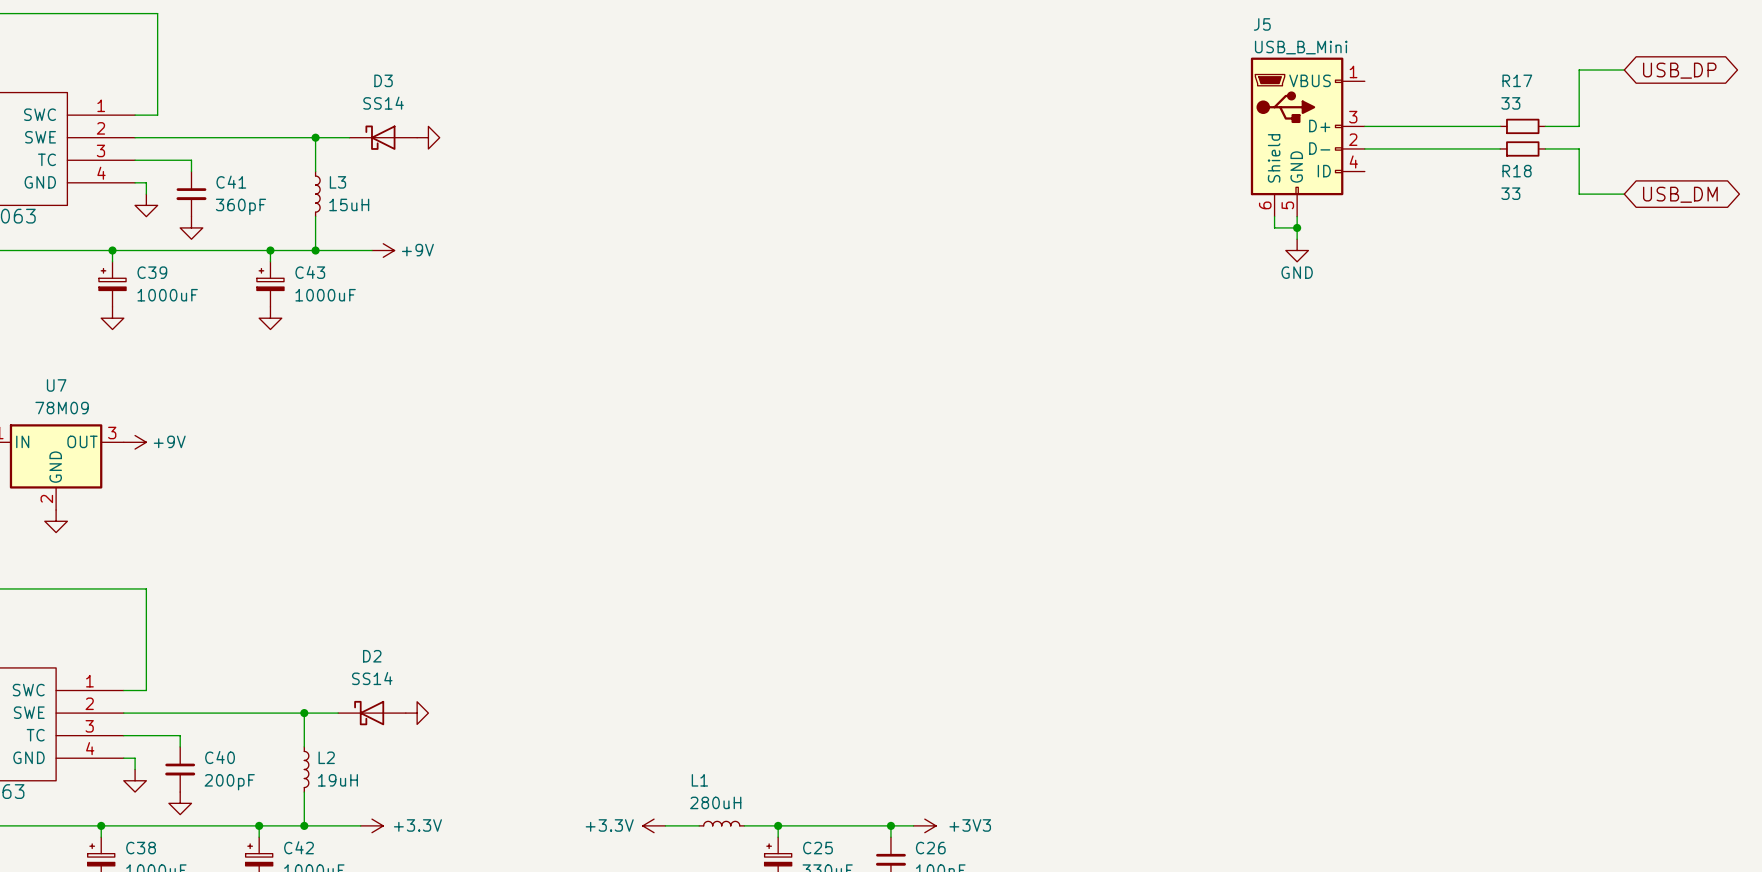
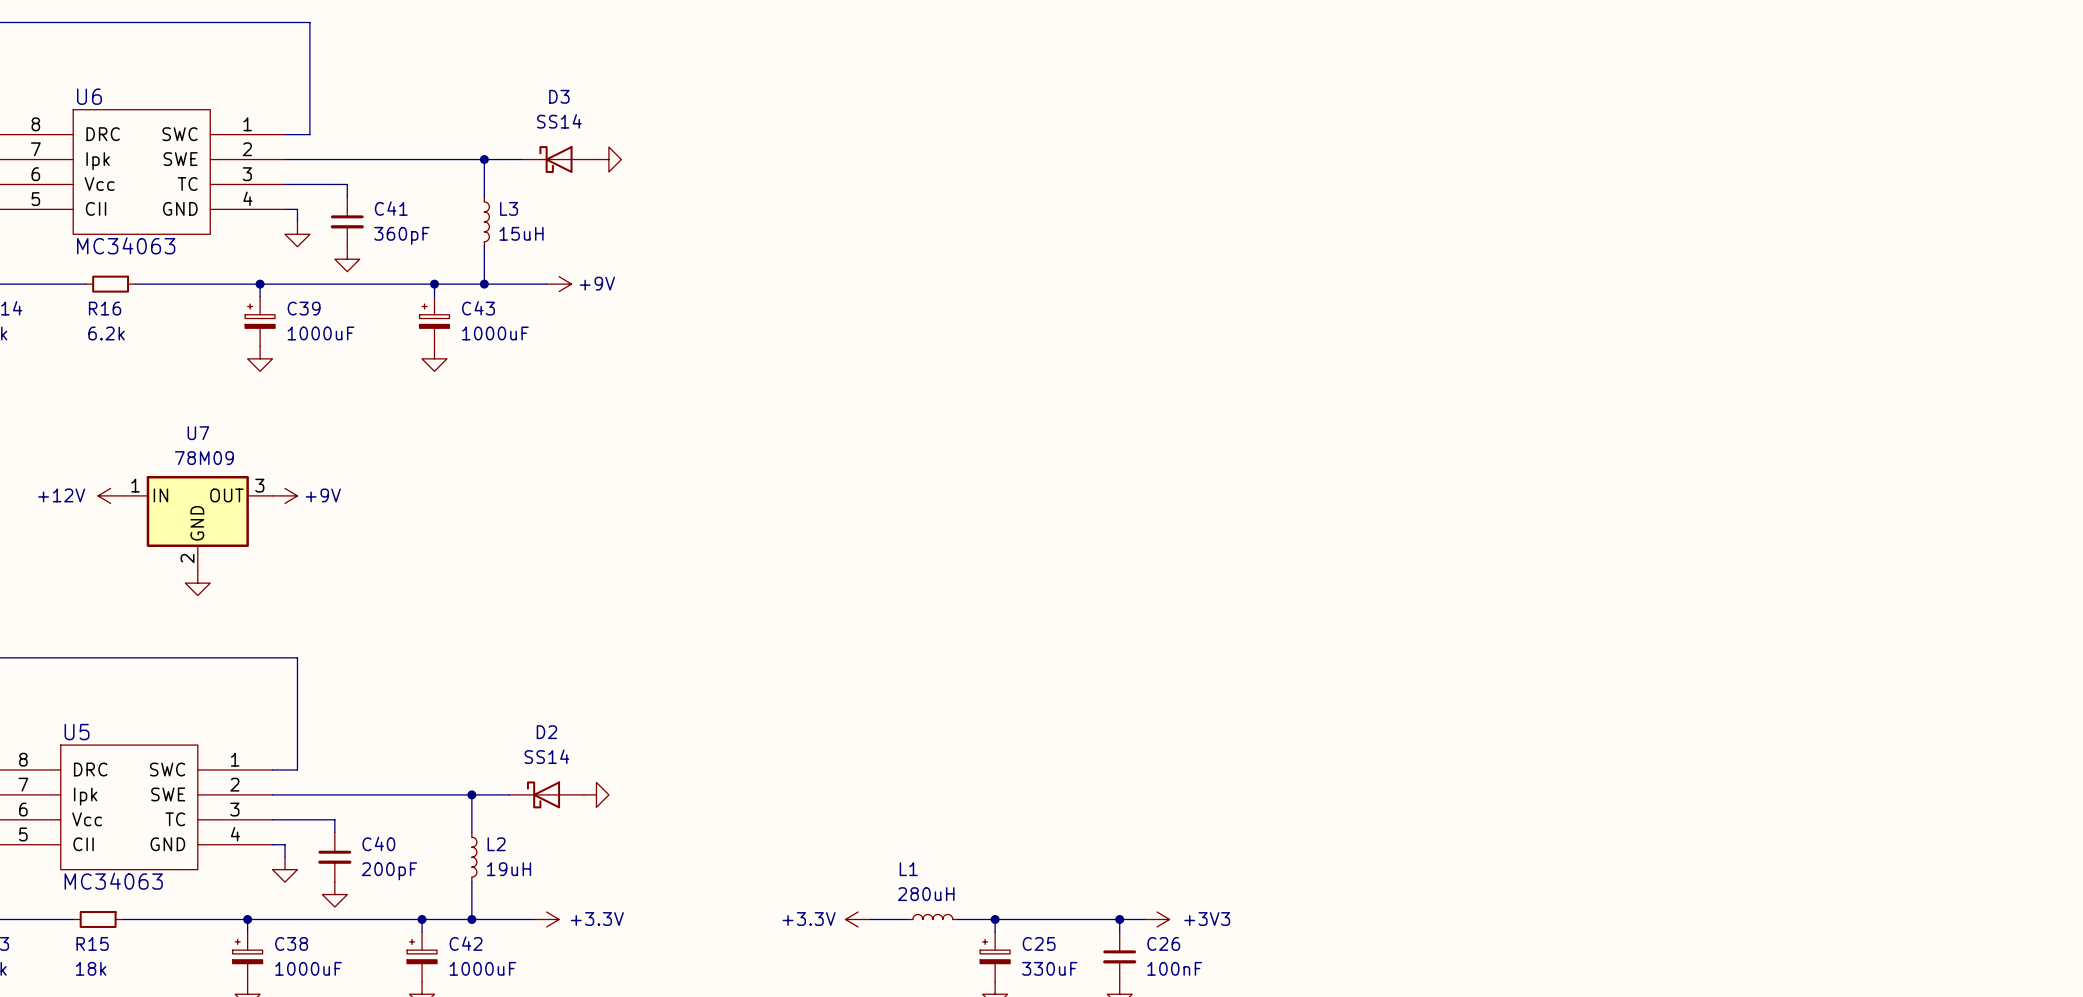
wire: (1624, 70) (1579, 70) (1579, 126) (1545, 126) -> none
global label: USB_DP (1679, 70) -> none
wire: (1364, 126) (1500, 126) -> none
R17: 33 (1522, 126) -> none
J5: USB_B_Mini (1307, 137) -> none
wire: (1364, 148) (1500, 148) -> none
R18: 33 (1522, 148) -> none
wire: (1545, 148) (1579, 148) (1579, 194) (1624, 194) -> none
global label: USB_DM (1680, 194) -> none
wire: (1274, 216) (1274, 227) (1297, 227) -> none
wire: (1297, 216) (1297, 239) -> none
junction: (1297, 227) -> none
power symbol: GND (1297, 250) -> none

